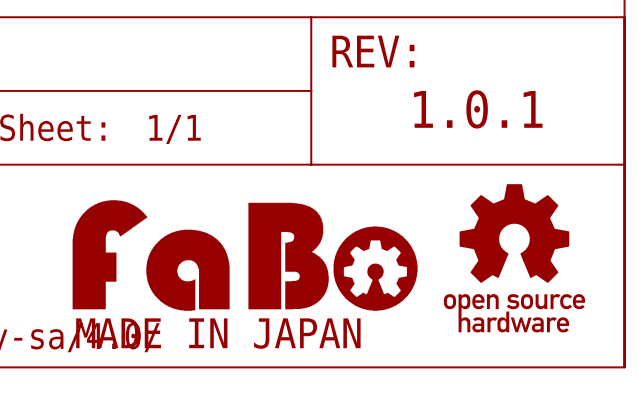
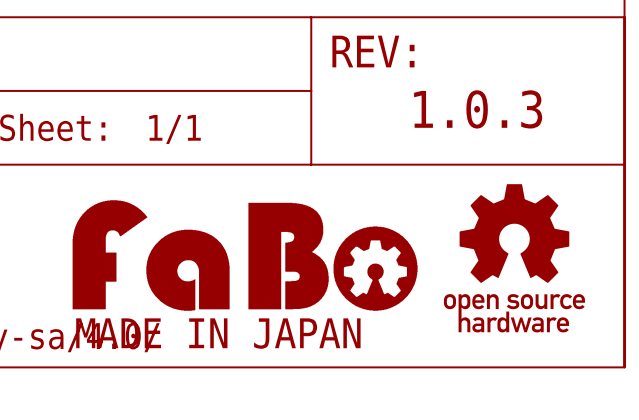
text: 1.0.1 (478, 109) -> 1.0.3 (478, 109)

